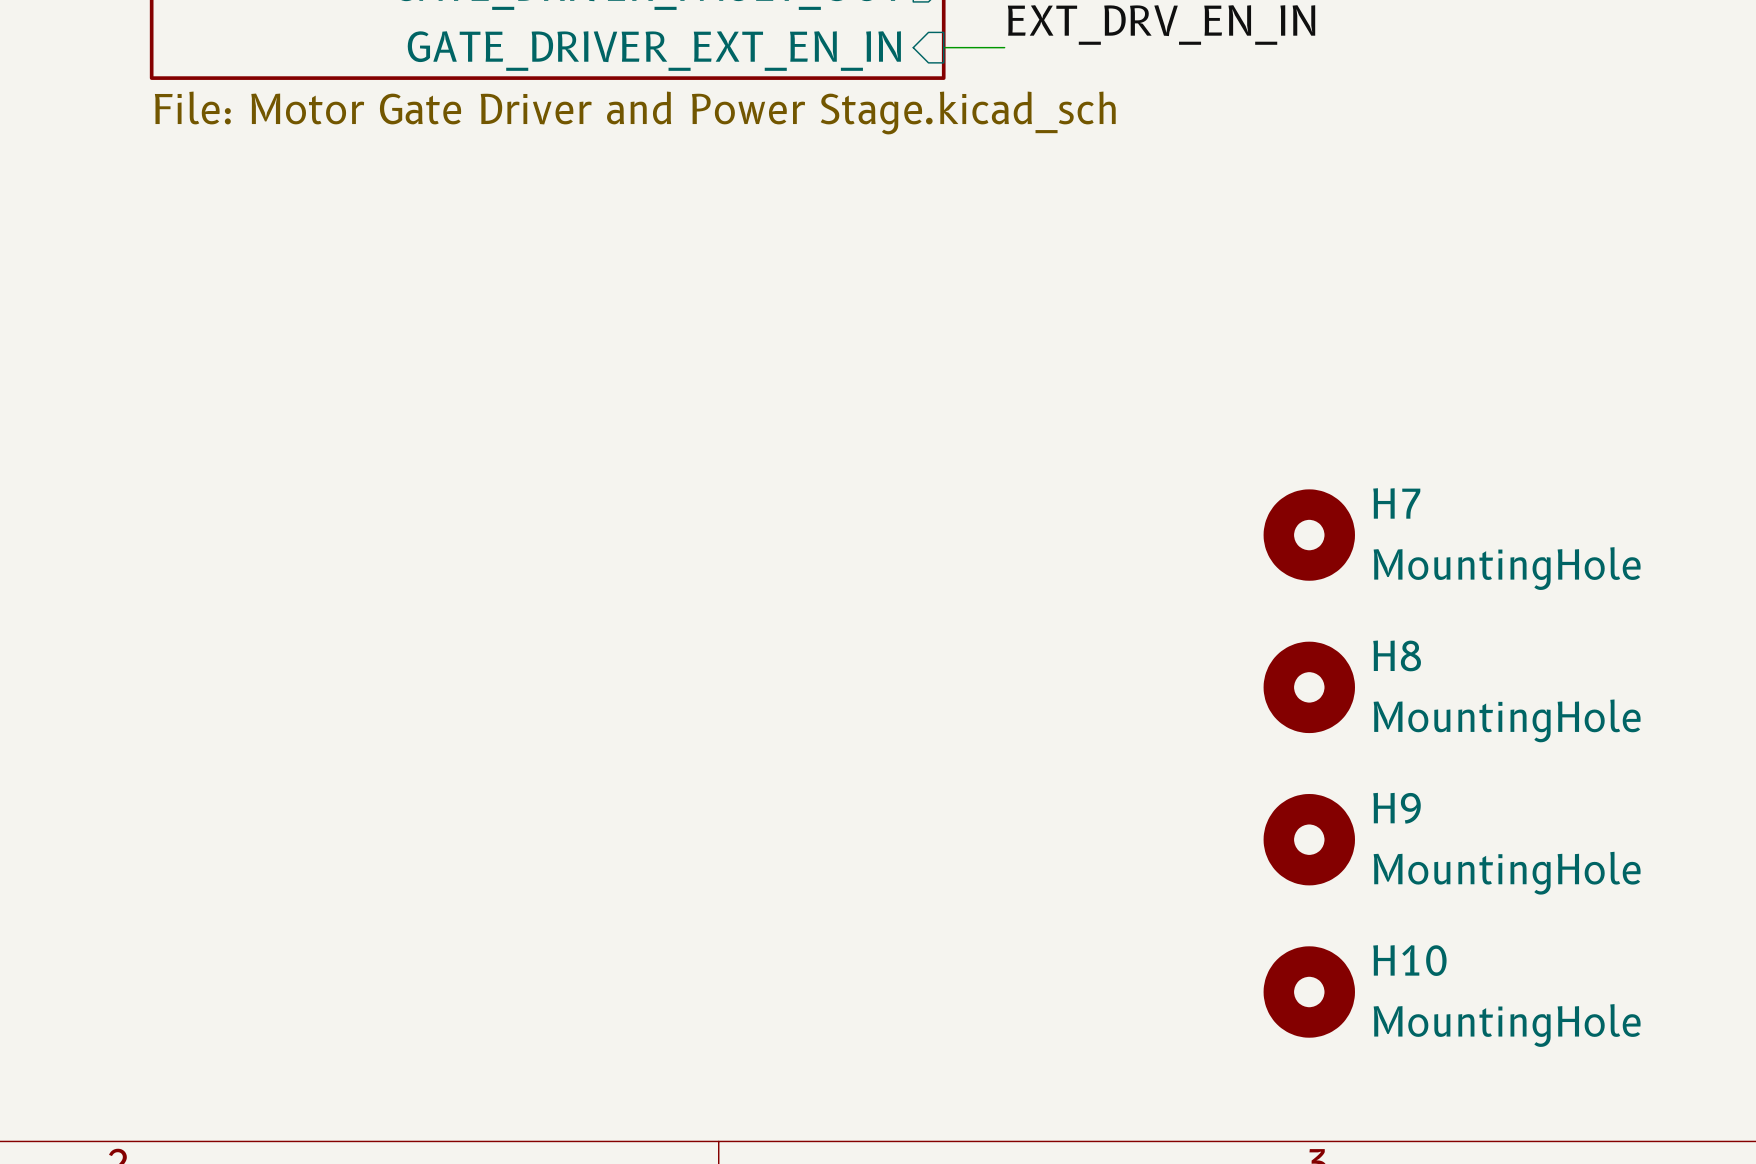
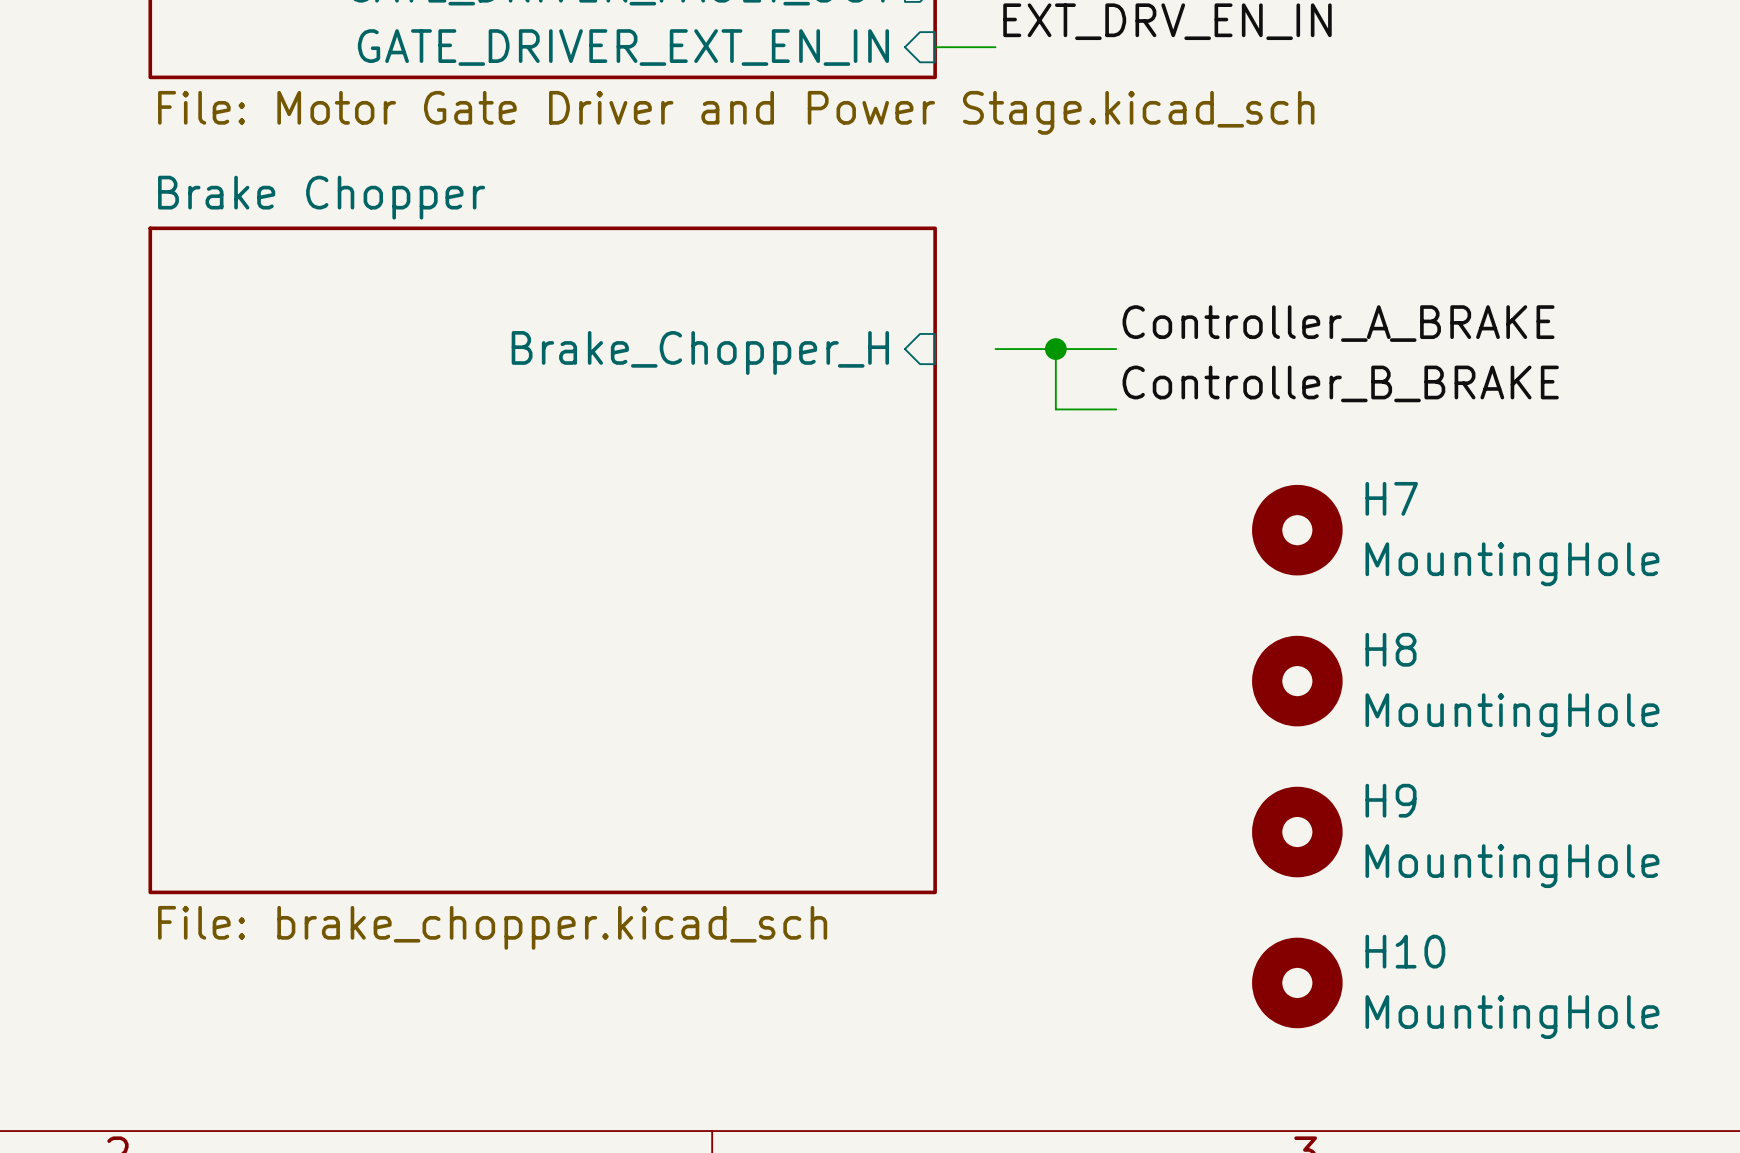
label: none -> Controller_A_BRAKE (1338, 323)
wire: none -> (995, 349) (1116, 349)
wire: none -> (1055, 349) (1055, 409) (1116, 409)
junction: none -> (1055, 349)
sheet pin: none -> Brake_Chopper_H (700, 352)
label: none -> Controller_B_BRAKE (1340, 383)
sheet Brake Chopper: none -> File: brake_chopper.kicad_sch (542, 560)

